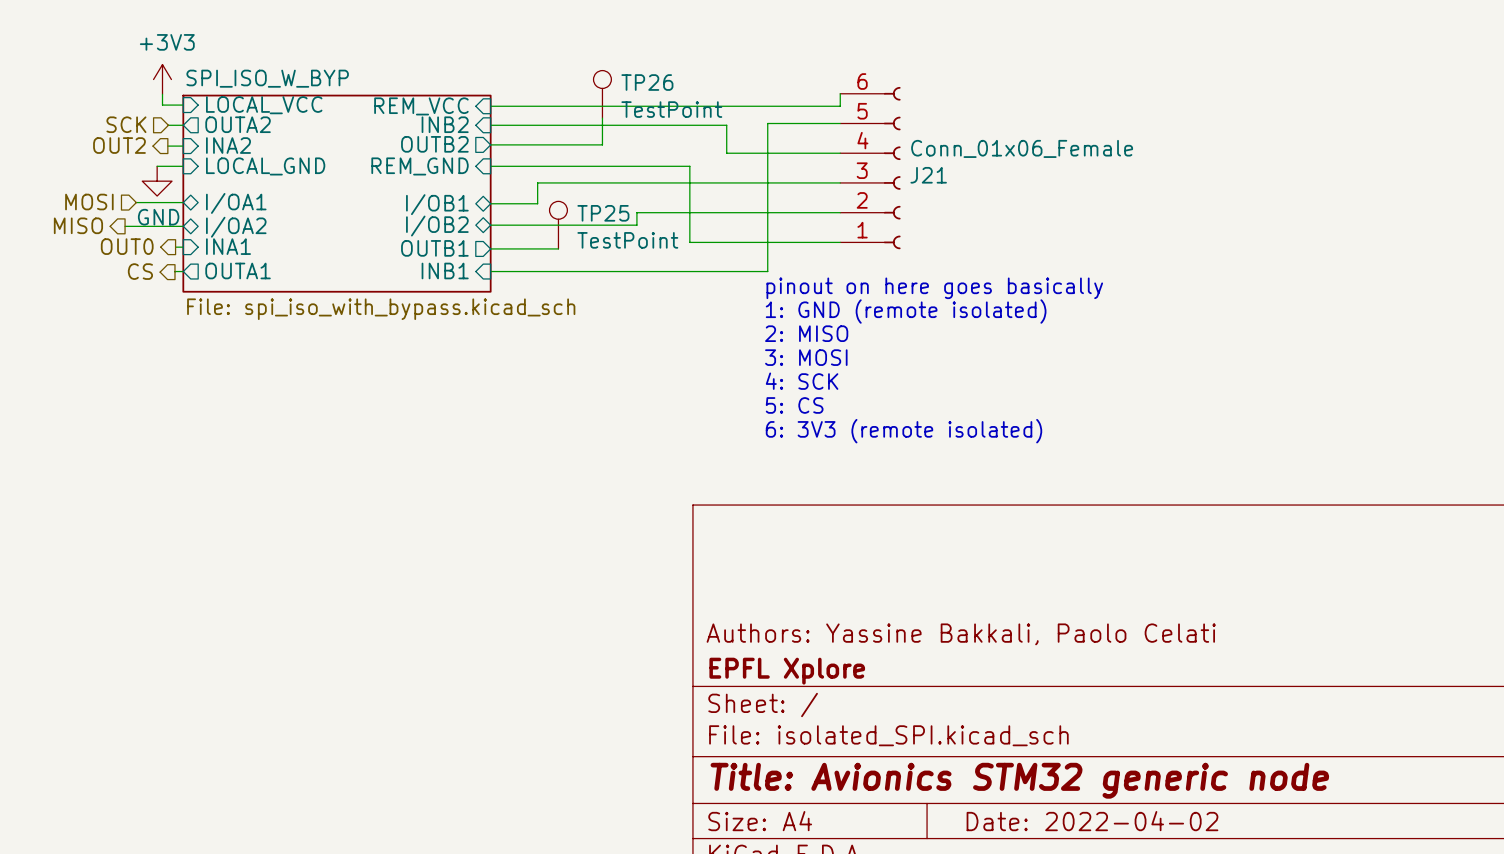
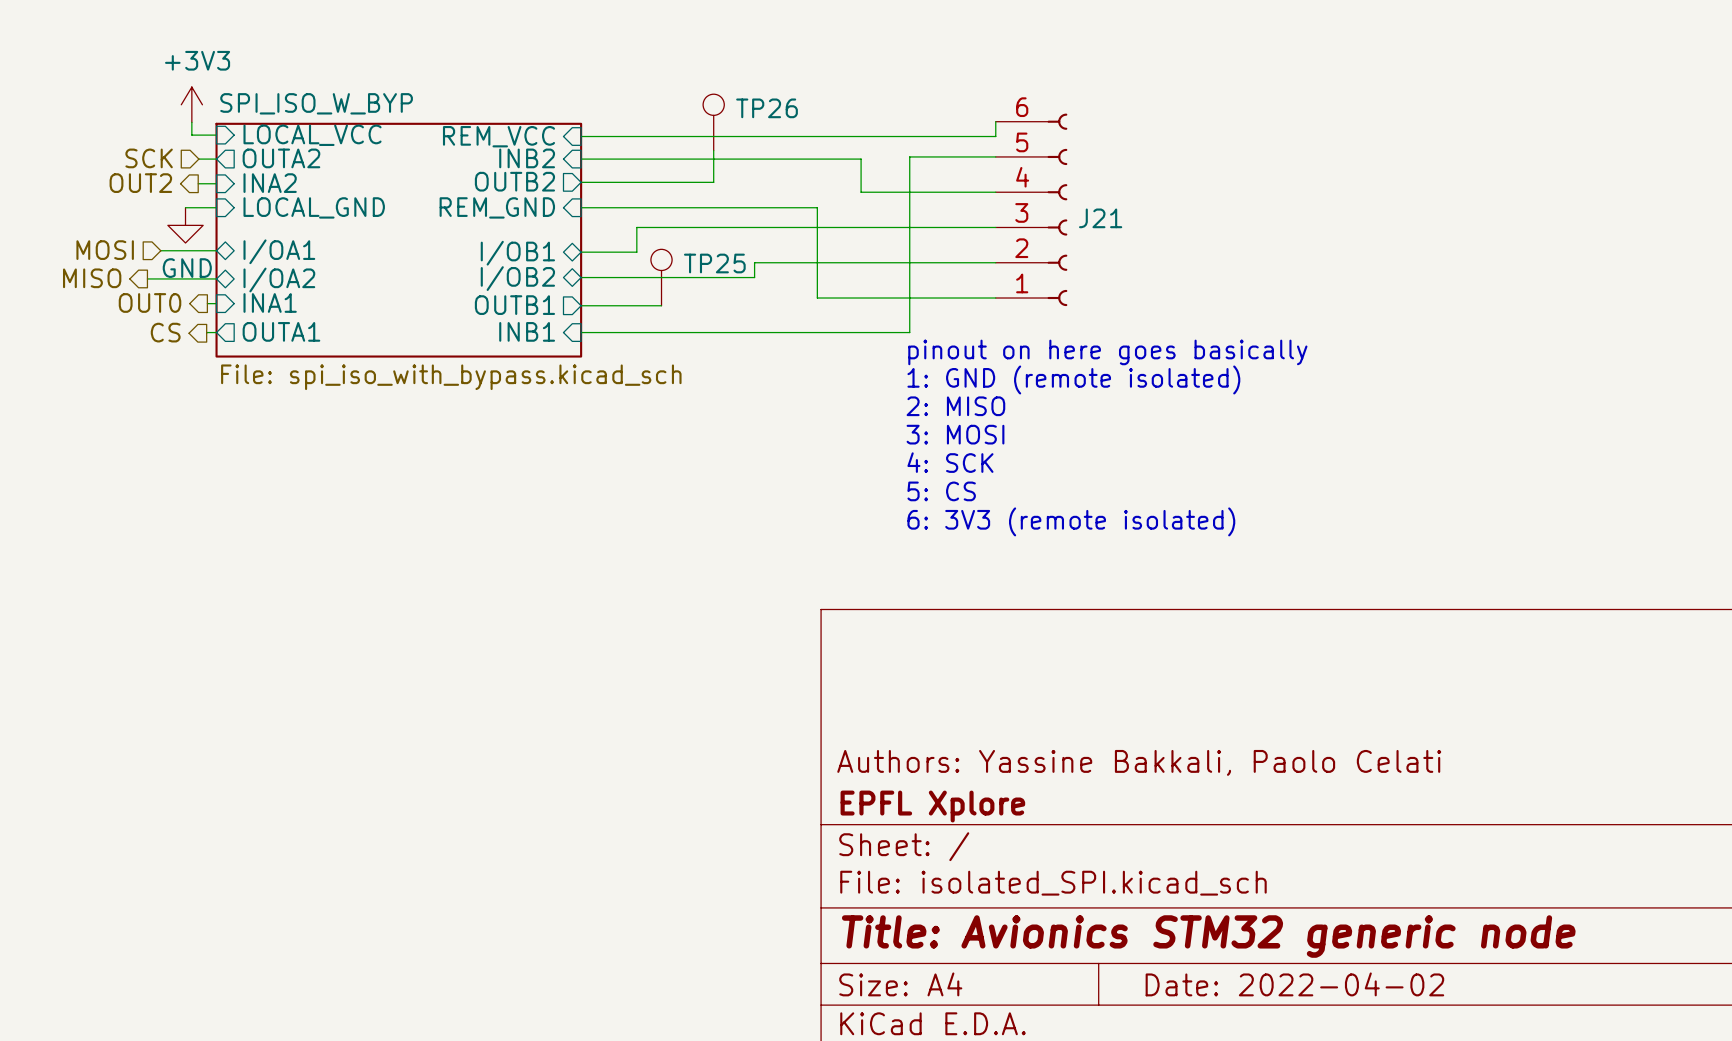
TP26 value: TestPoint (671, 109) -> none
J21 value: Conn_01x06_Female (1022, 148) -> none
TP25 value: TestPoint (627, 240) -> none

